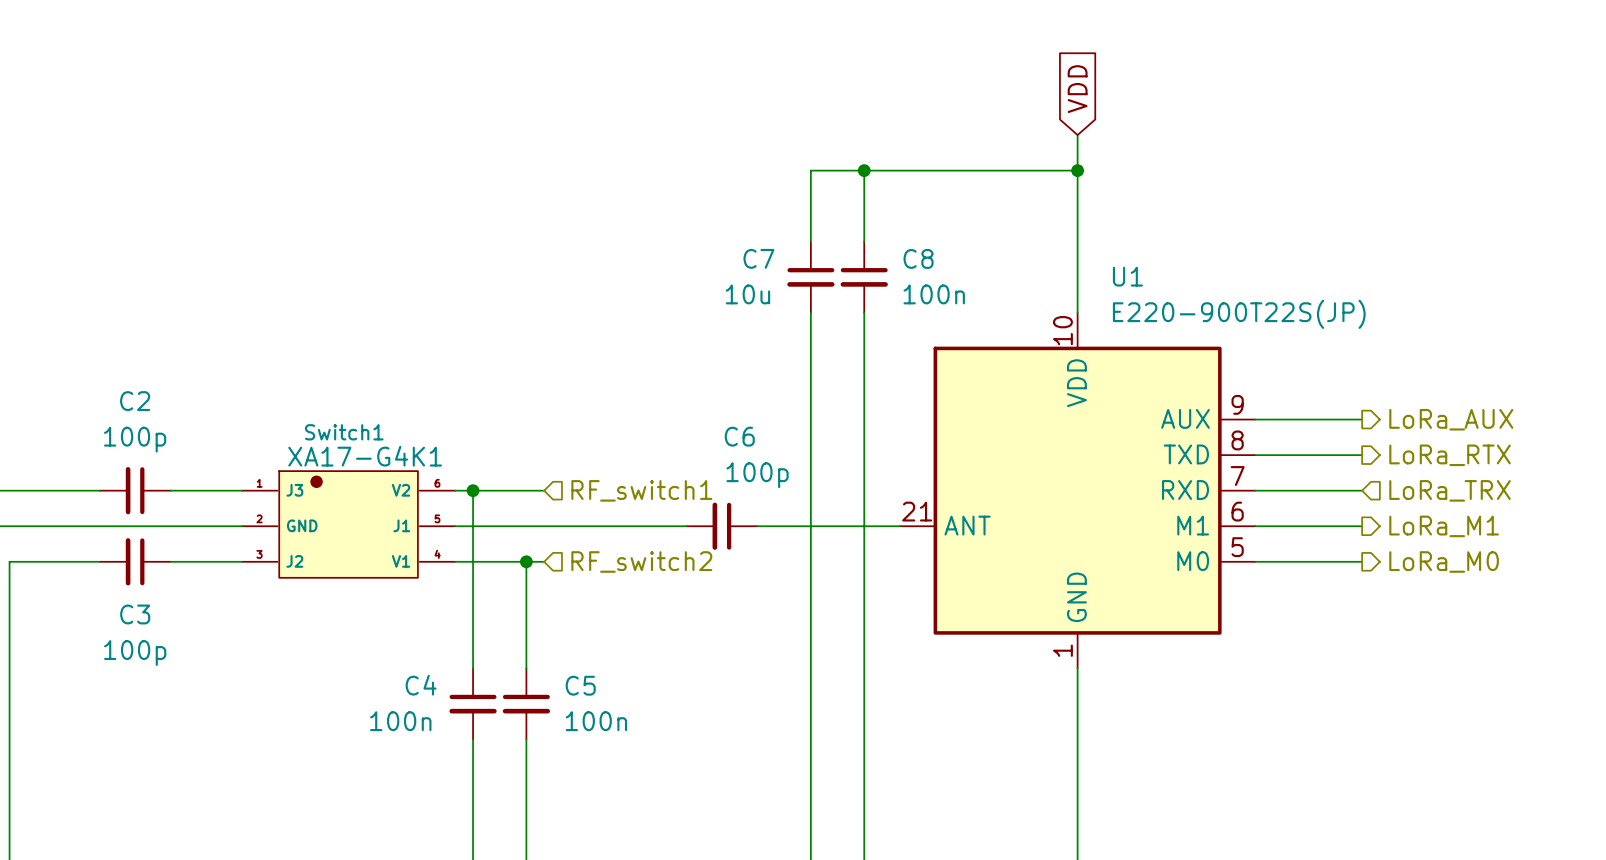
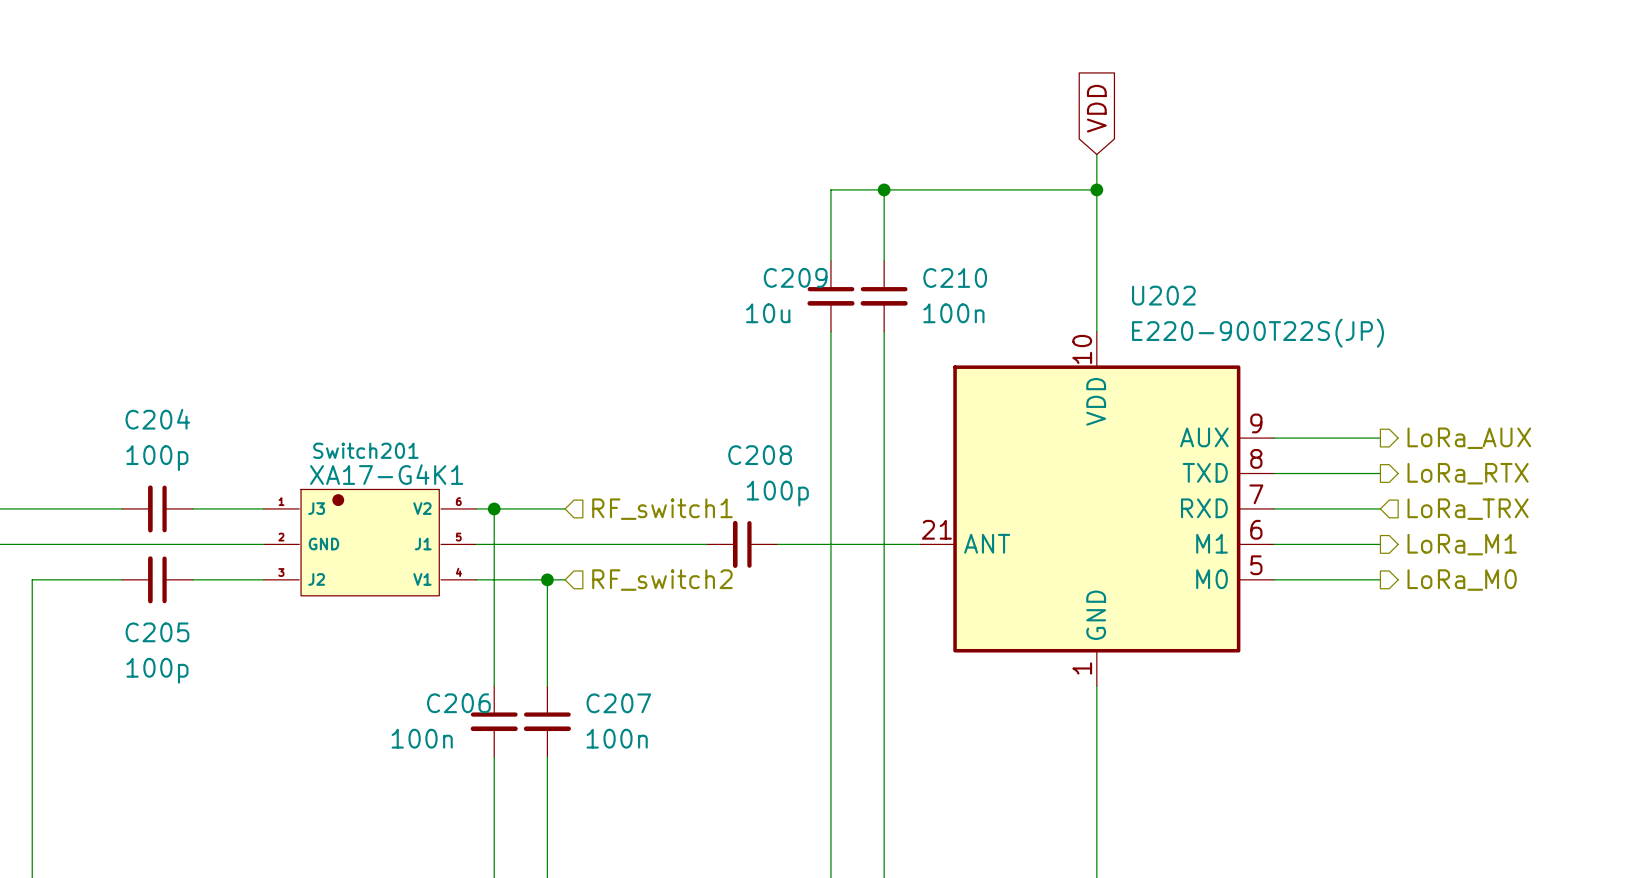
C7 name: C7 (758, 258) -> C209 (795, 277)
C8 name: C8 (918, 258) -> C210 (955, 277)
U1 name: U1 (1127, 276) -> U202 (1163, 295)
C2 name: C2 (135, 401) -> C204 (157, 419)
Switch1 name: Switch1 (344, 432) -> Switch201 (365, 450)
C6 name: C6 (739, 436) -> C208 (760, 455)
C3 name: C3 (135, 614) -> C205 (157, 632)
C4 name: C4 (421, 685) -> C206 (458, 703)
C5 name: C5 (580, 685) -> C207 (618, 703)

